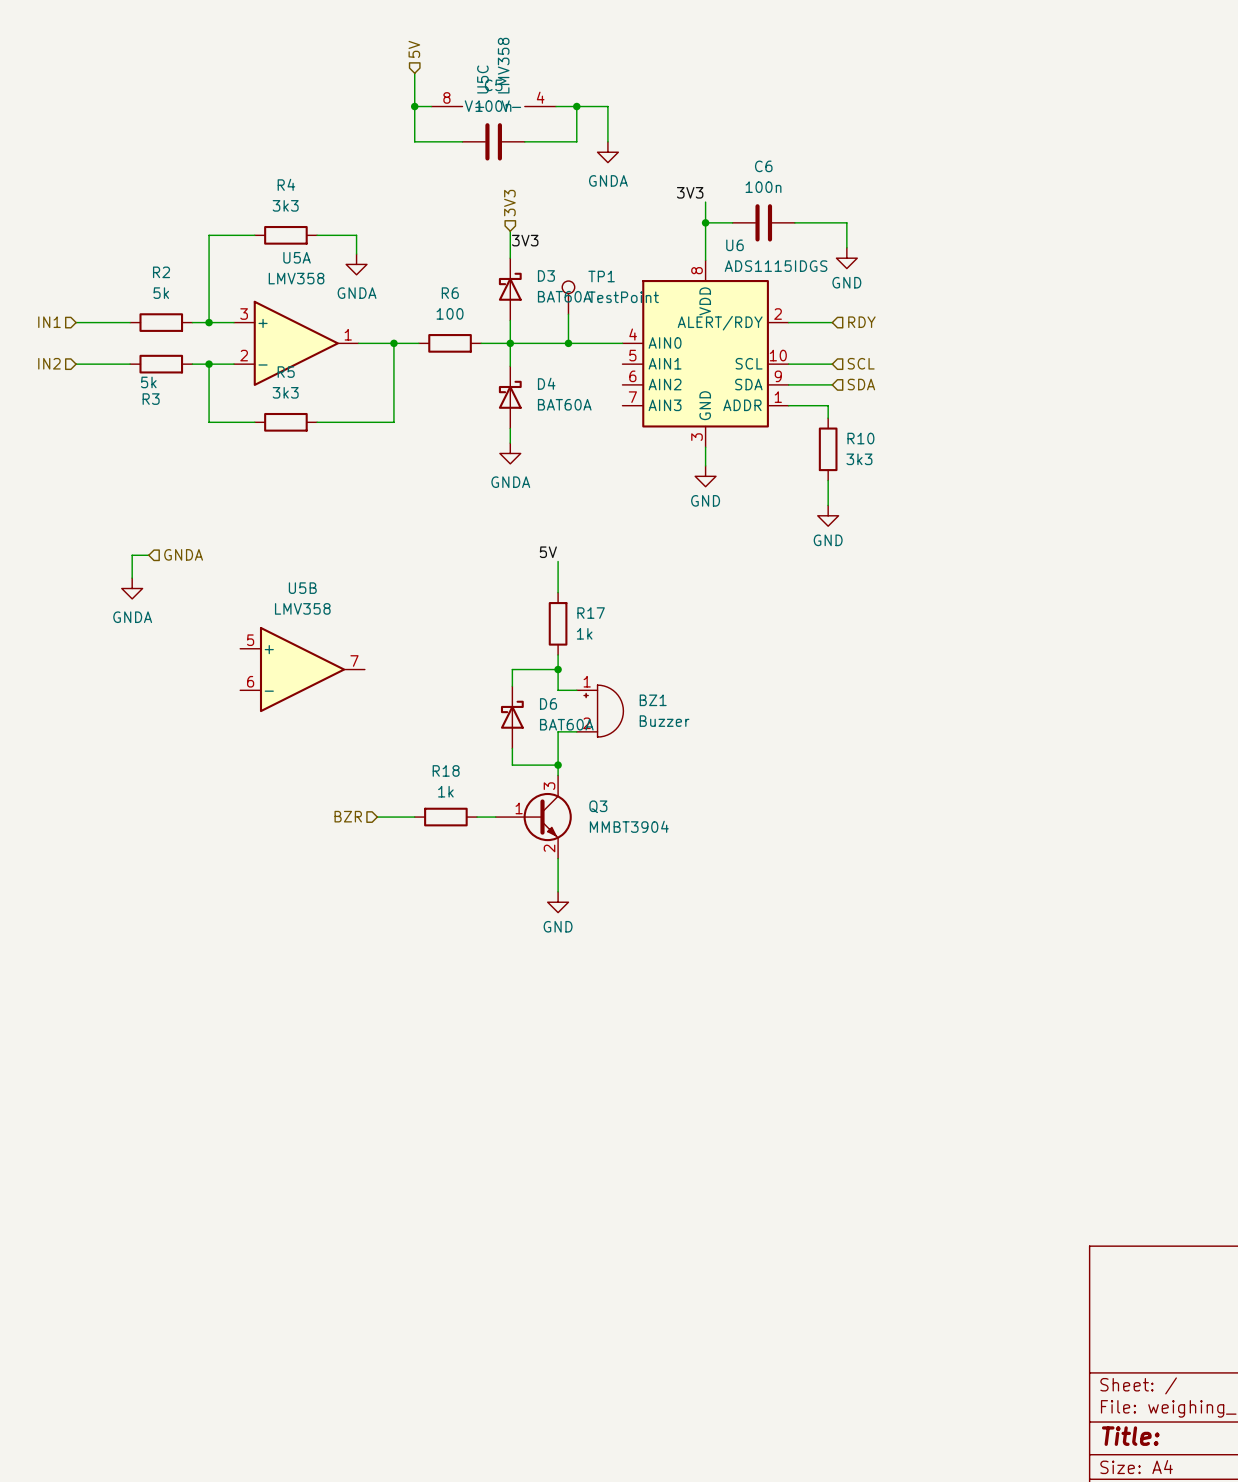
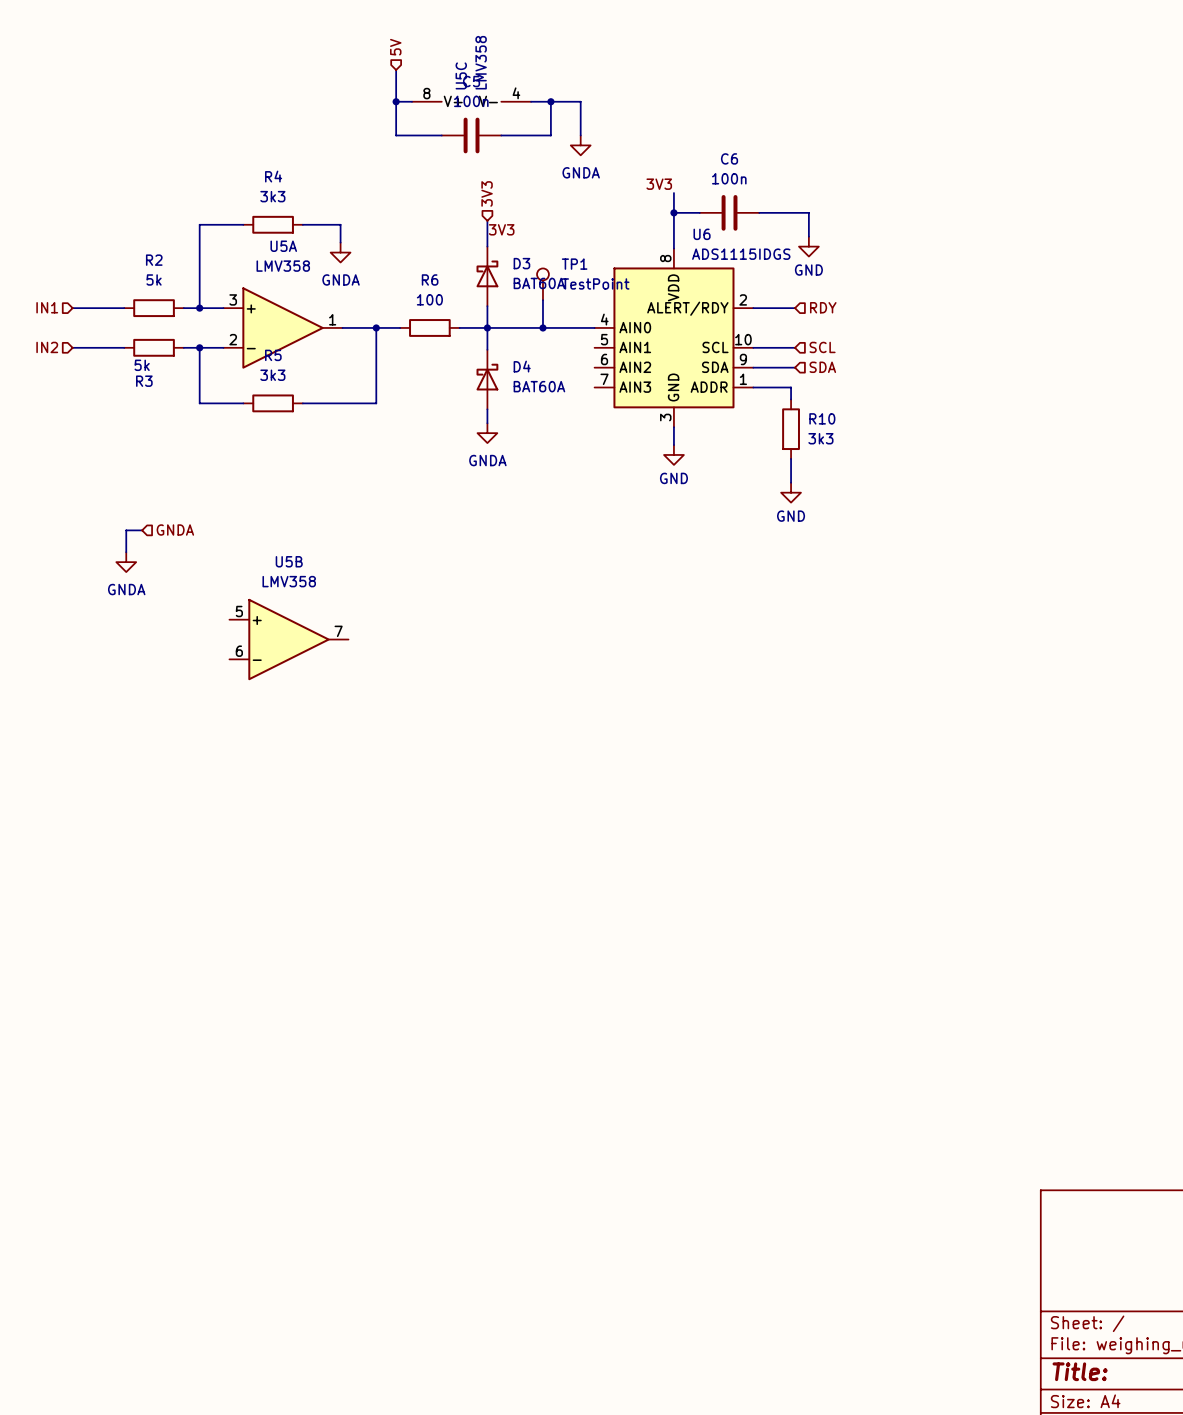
label: 5V (548, 552) -> none
wire: (558, 561) (558, 592) -> none
R17: 1k (558, 623) -> none
wire: (558, 655) (558, 690) (576, 690) -> none
wire: (558, 669) (512, 669) (512, 686) -> none
junction: (558, 669) -> none
BZ1: Buzzer (600, 711) -> none
D6: BAT60A (512, 717) -> none
wire: (576, 731) (558, 731) (558, 775) -> none
wire: (512, 748) (512, 765) (558, 765) -> none
junction: (558, 765) -> none
hierarchical label: BZR (348, 816) -> none
wire: (377, 817) (414, 817) -> none
R18: 1k (445, 817) -> none
wire: (477, 817) (495, 817) -> none
Q3: MMBT3904 (533, 817) -> none
wire: (558, 858) (558, 891) -> none
power symbol: GND (558, 902) -> none

